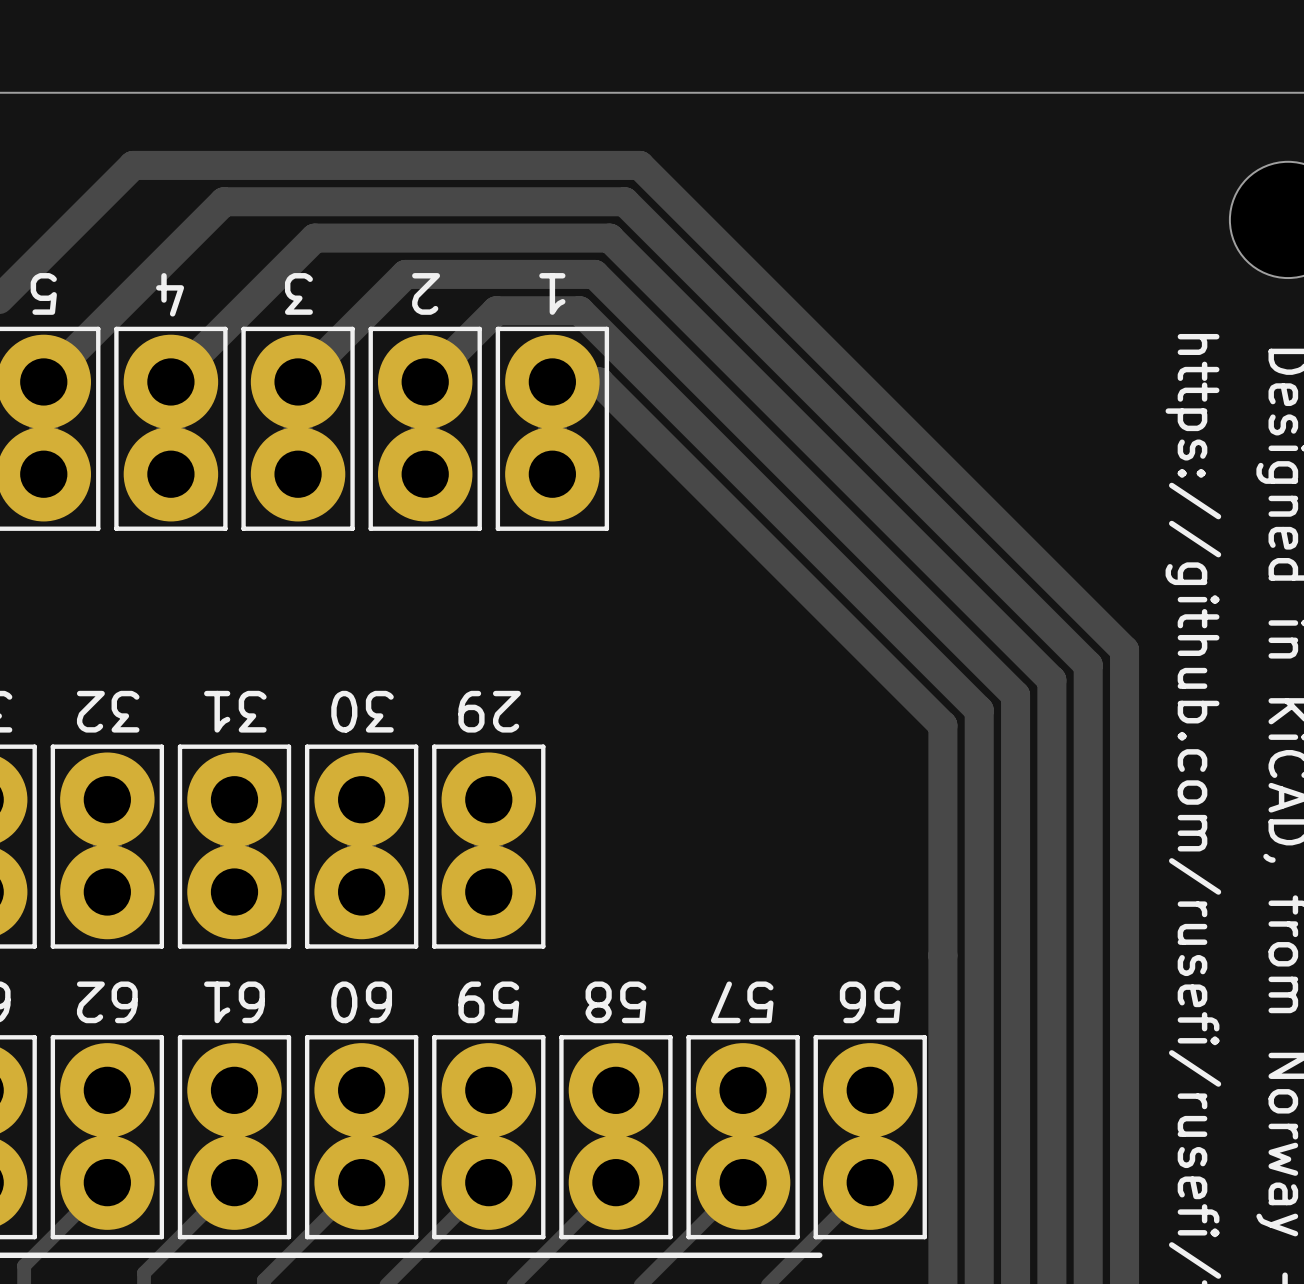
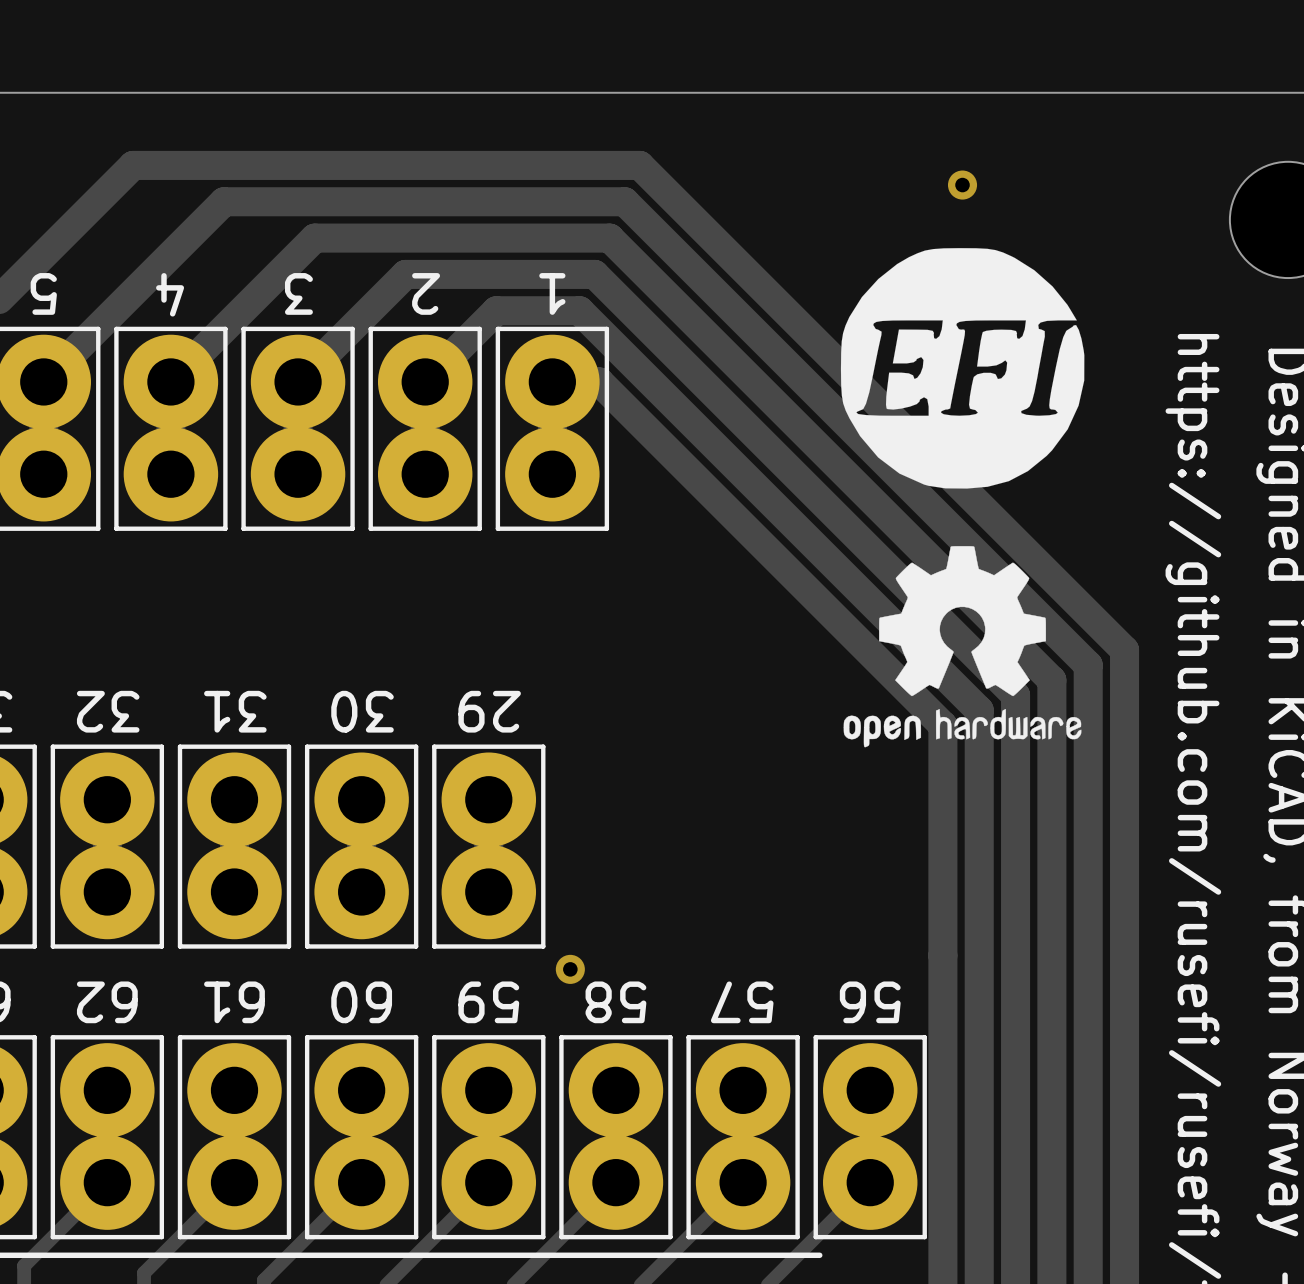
via: none -> (962, 185)
drawing: none -> [840, 248, 1085, 489]
drawing: none -> [843, 546, 1082, 748]
via: none -> (570, 969)

